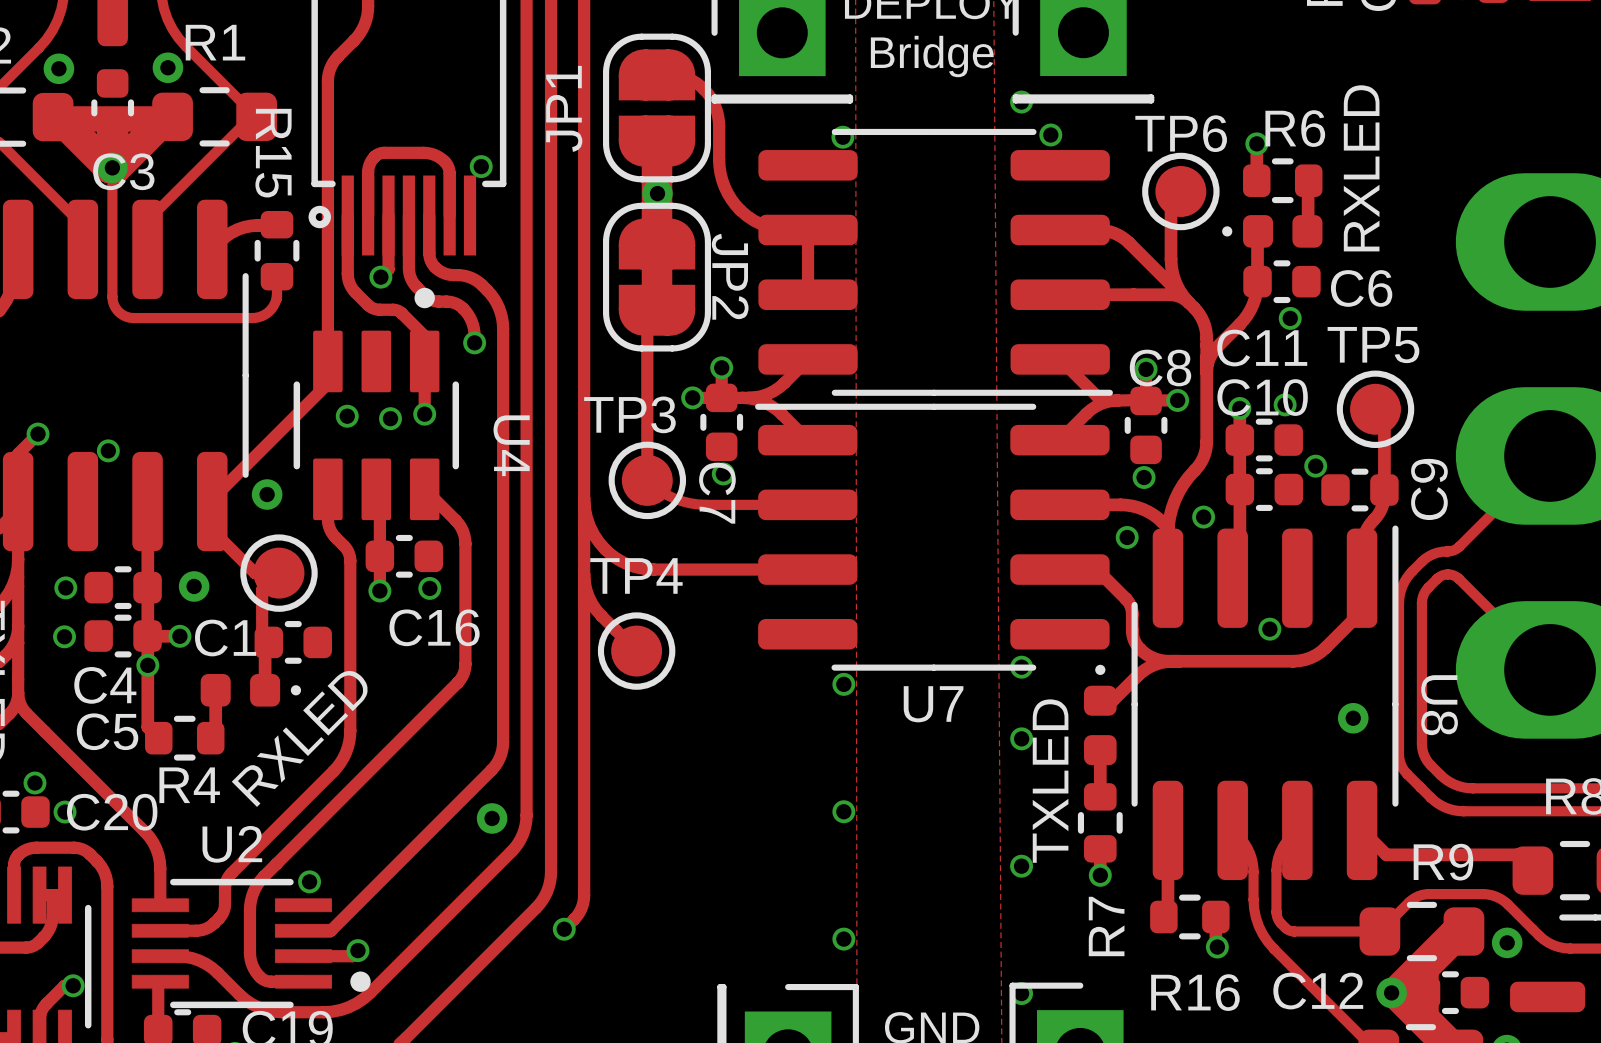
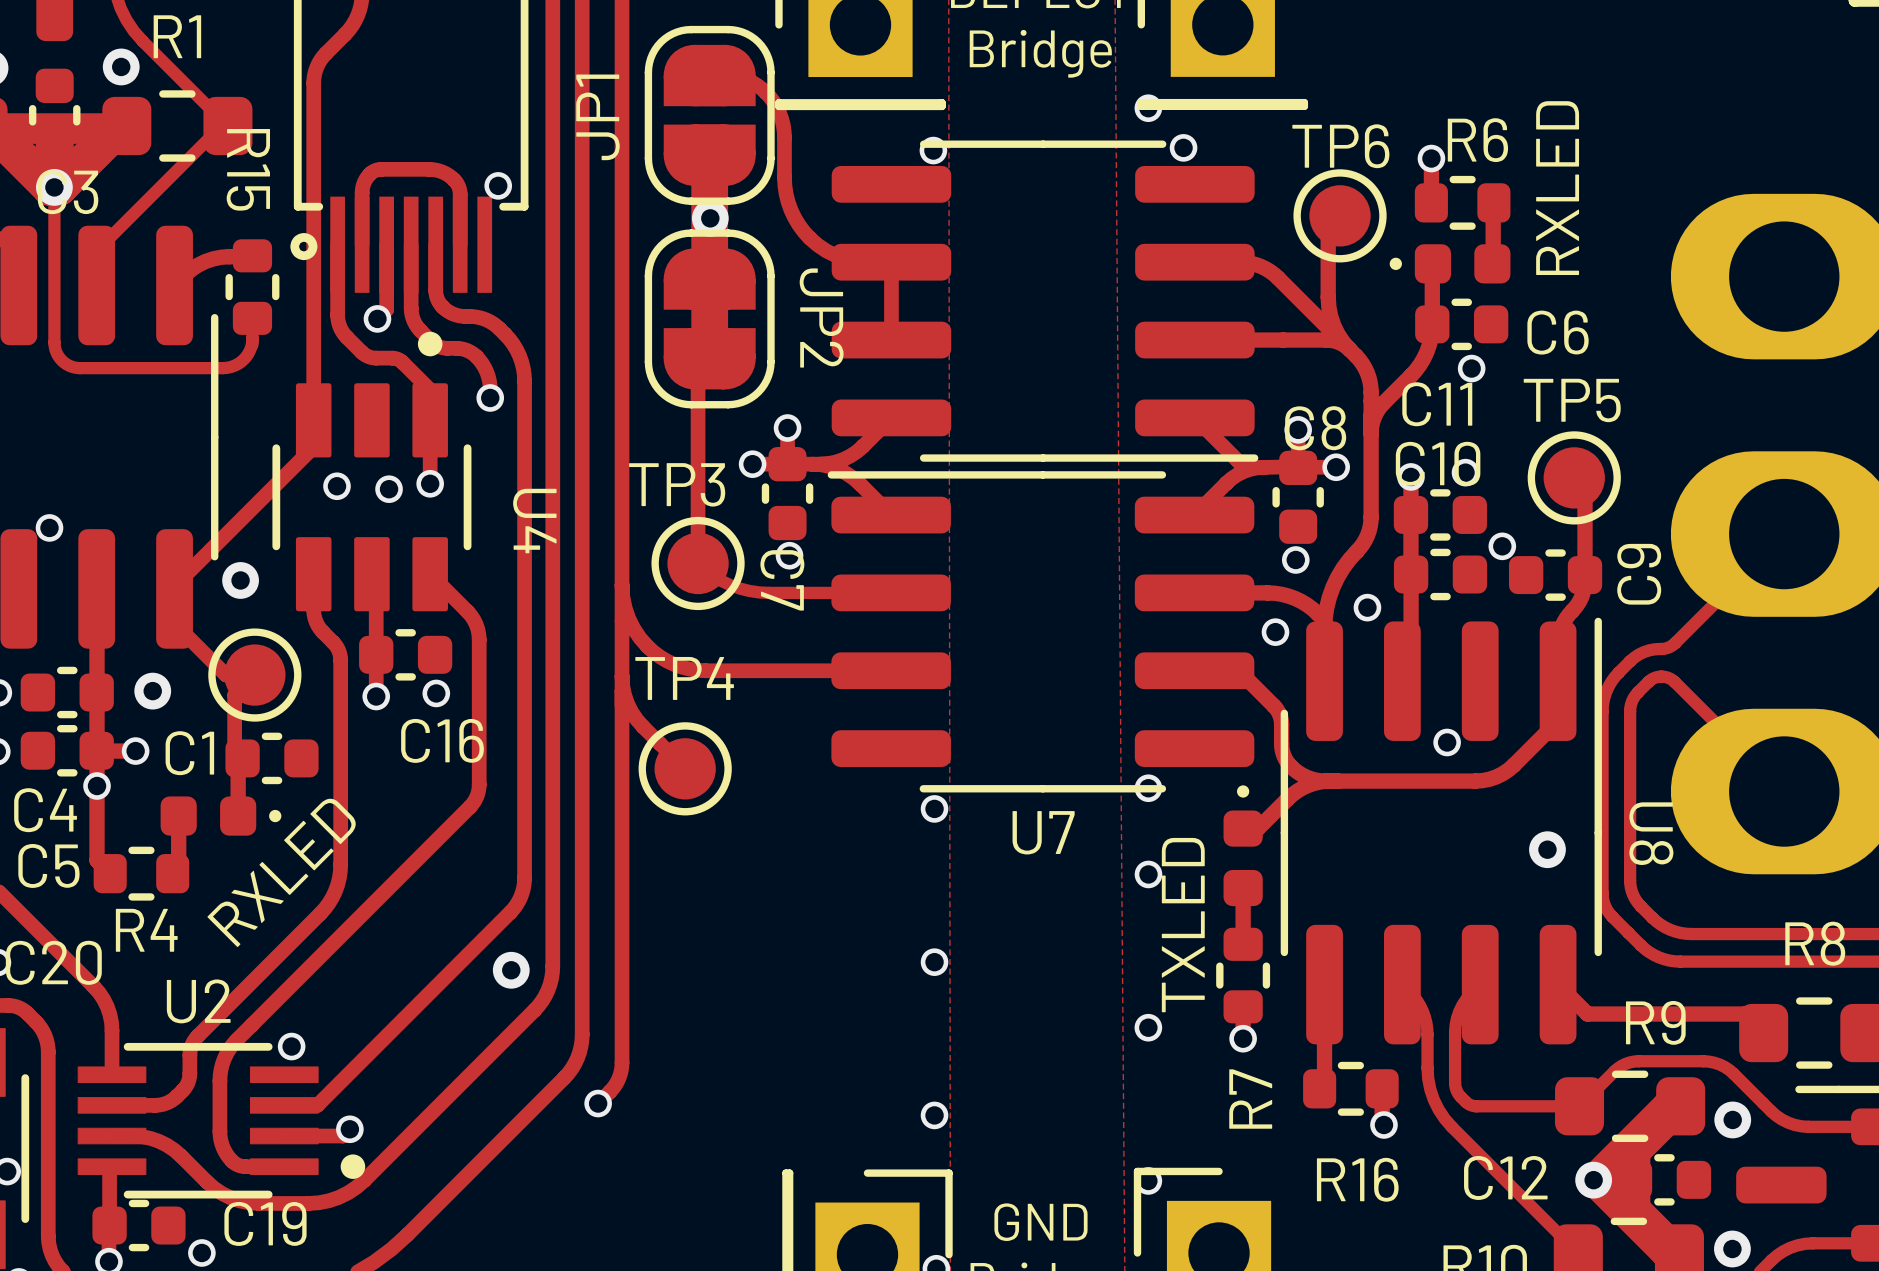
JP2 name position: JP2 (730, 276) -> JP2 (821, 318)

